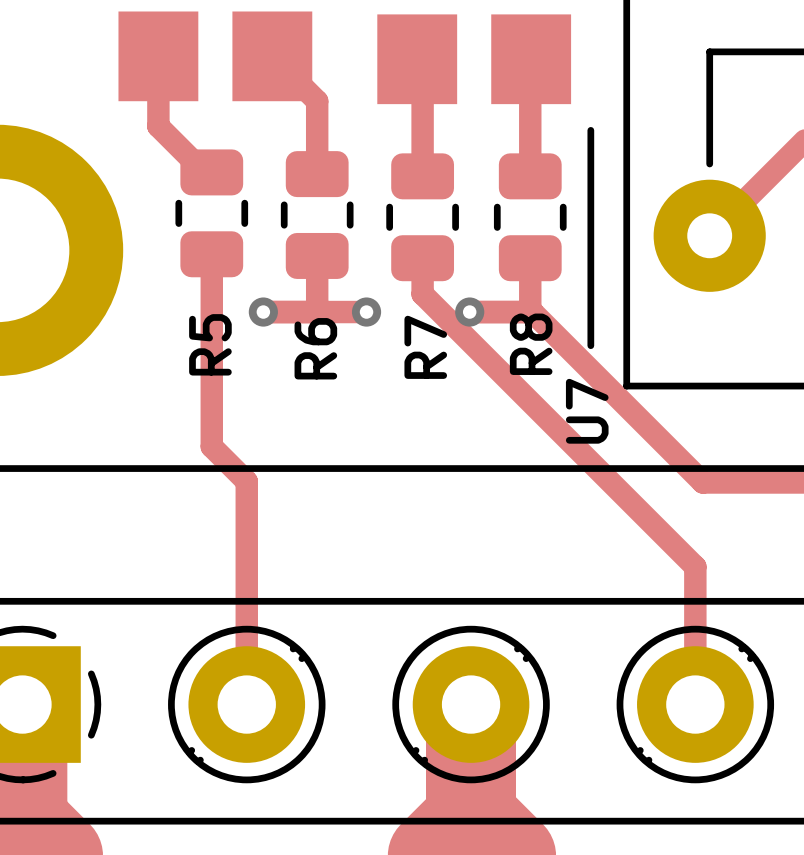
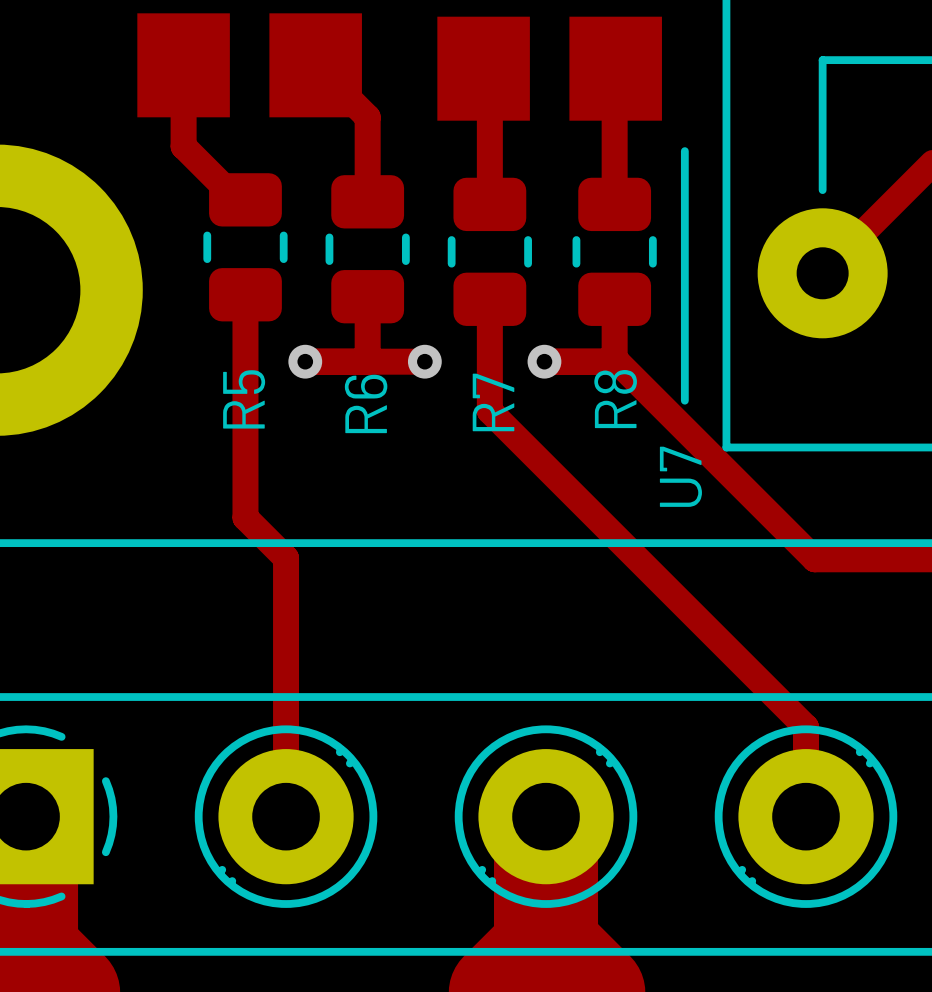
track: (422, 294) (695, 566) (695, 627) -> (489, 340) (489, 411) (806, 727)

